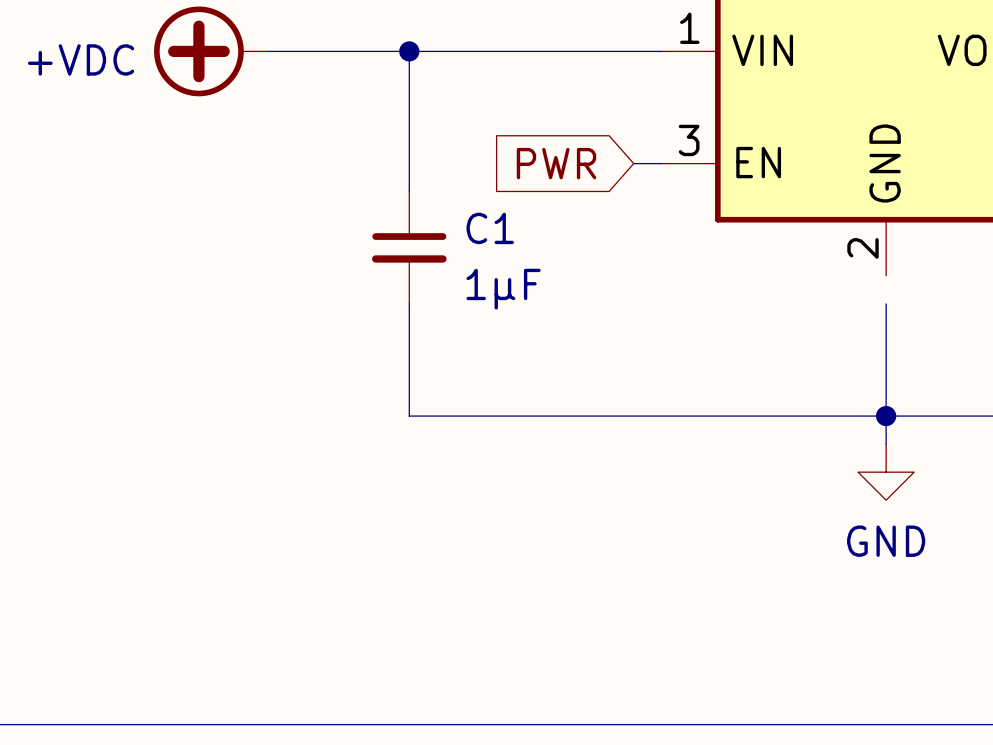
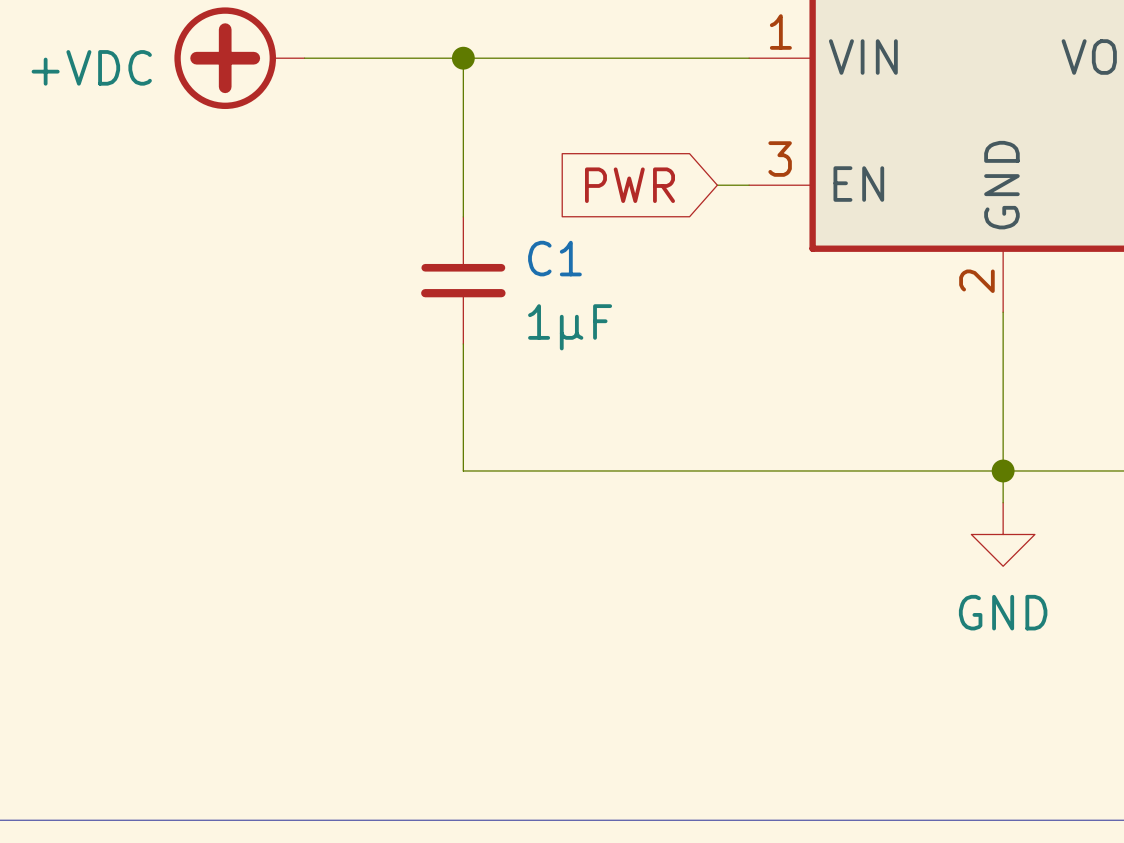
wire: none -> (1003, 312) (1003, 343)

